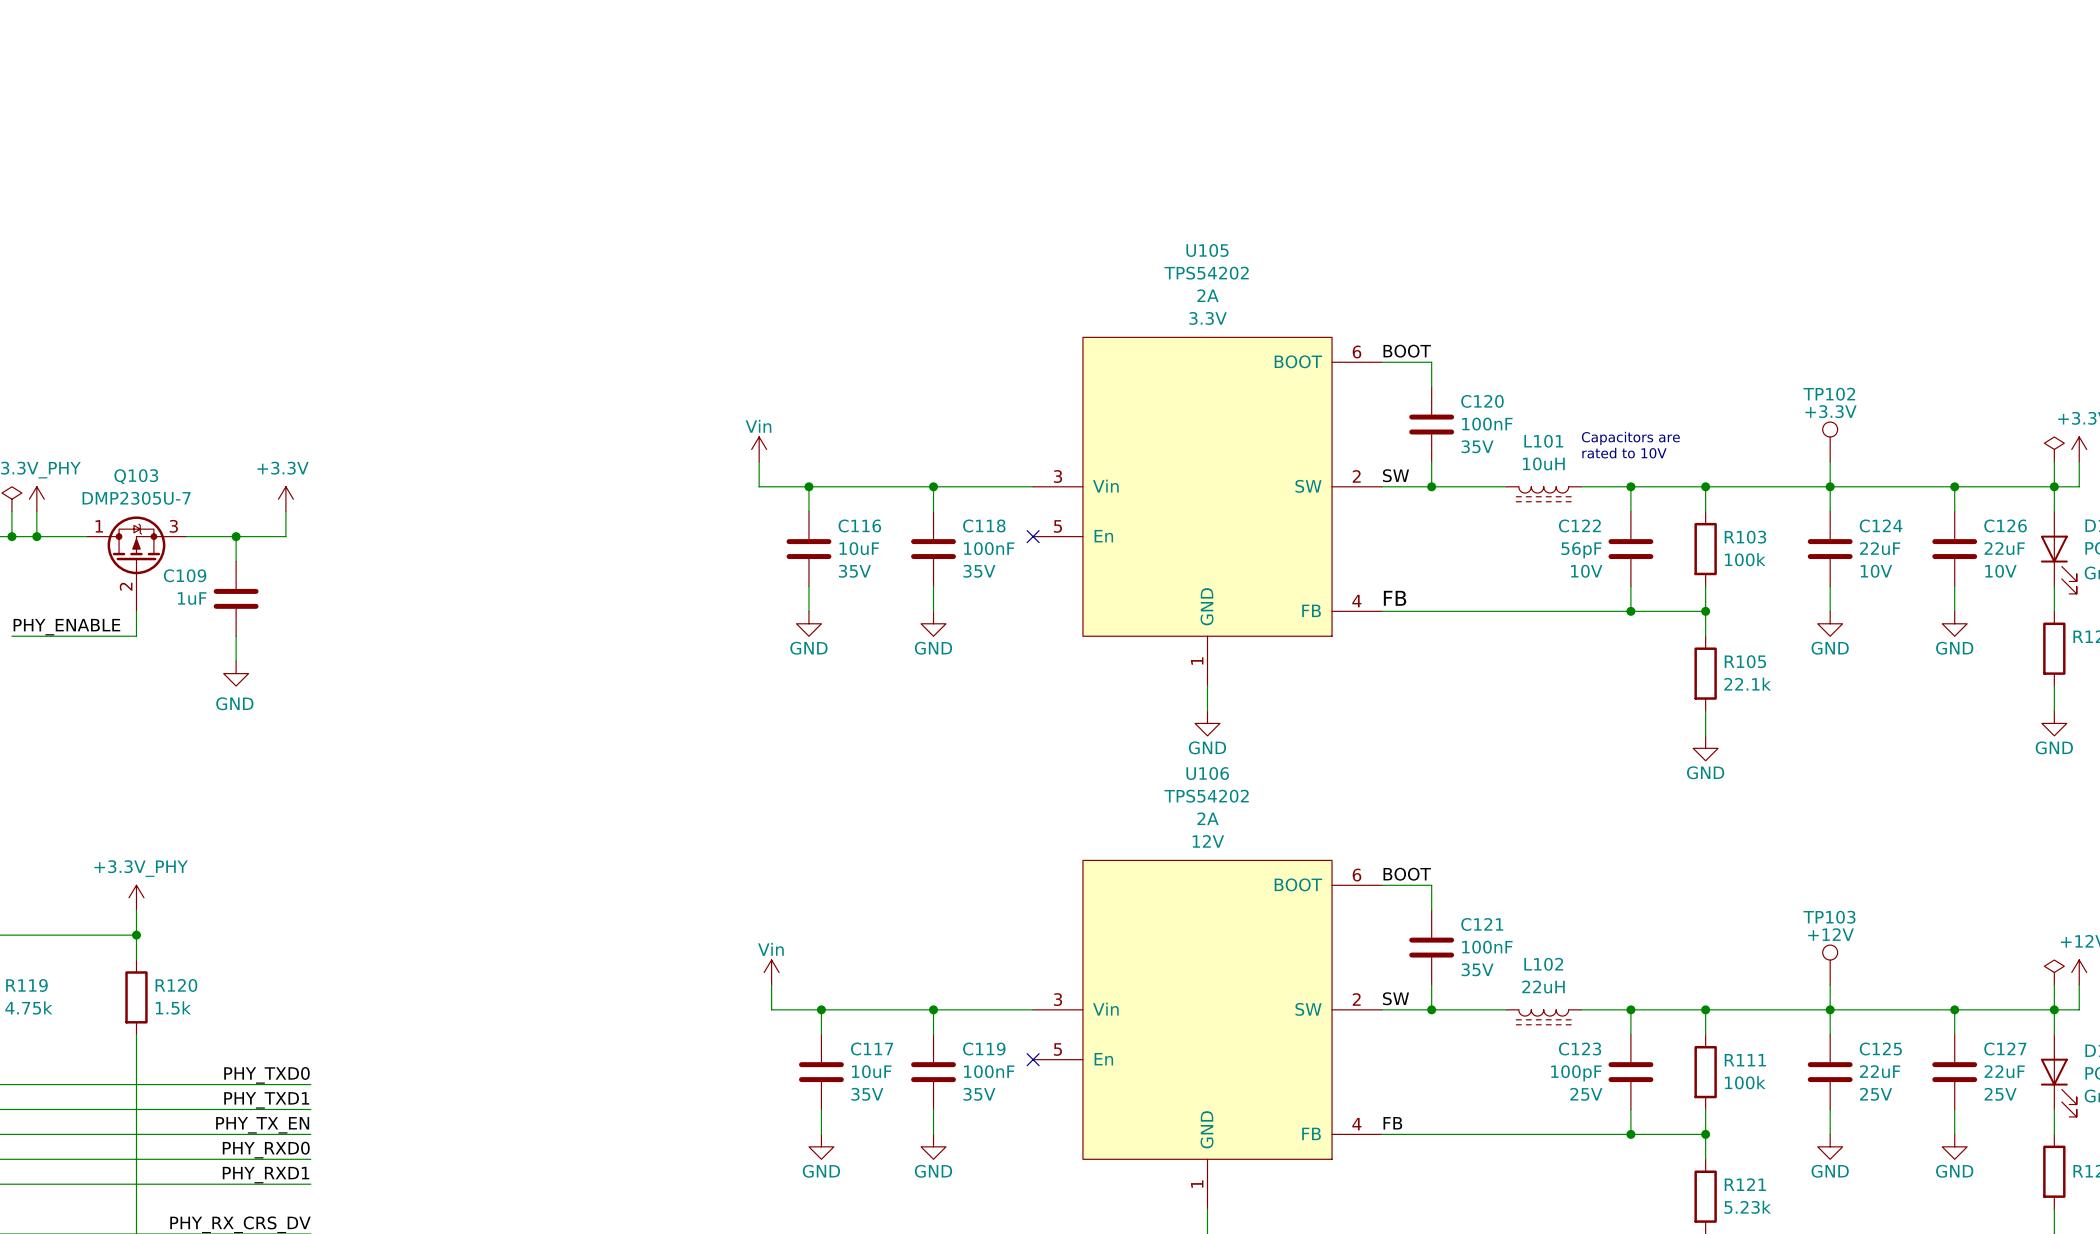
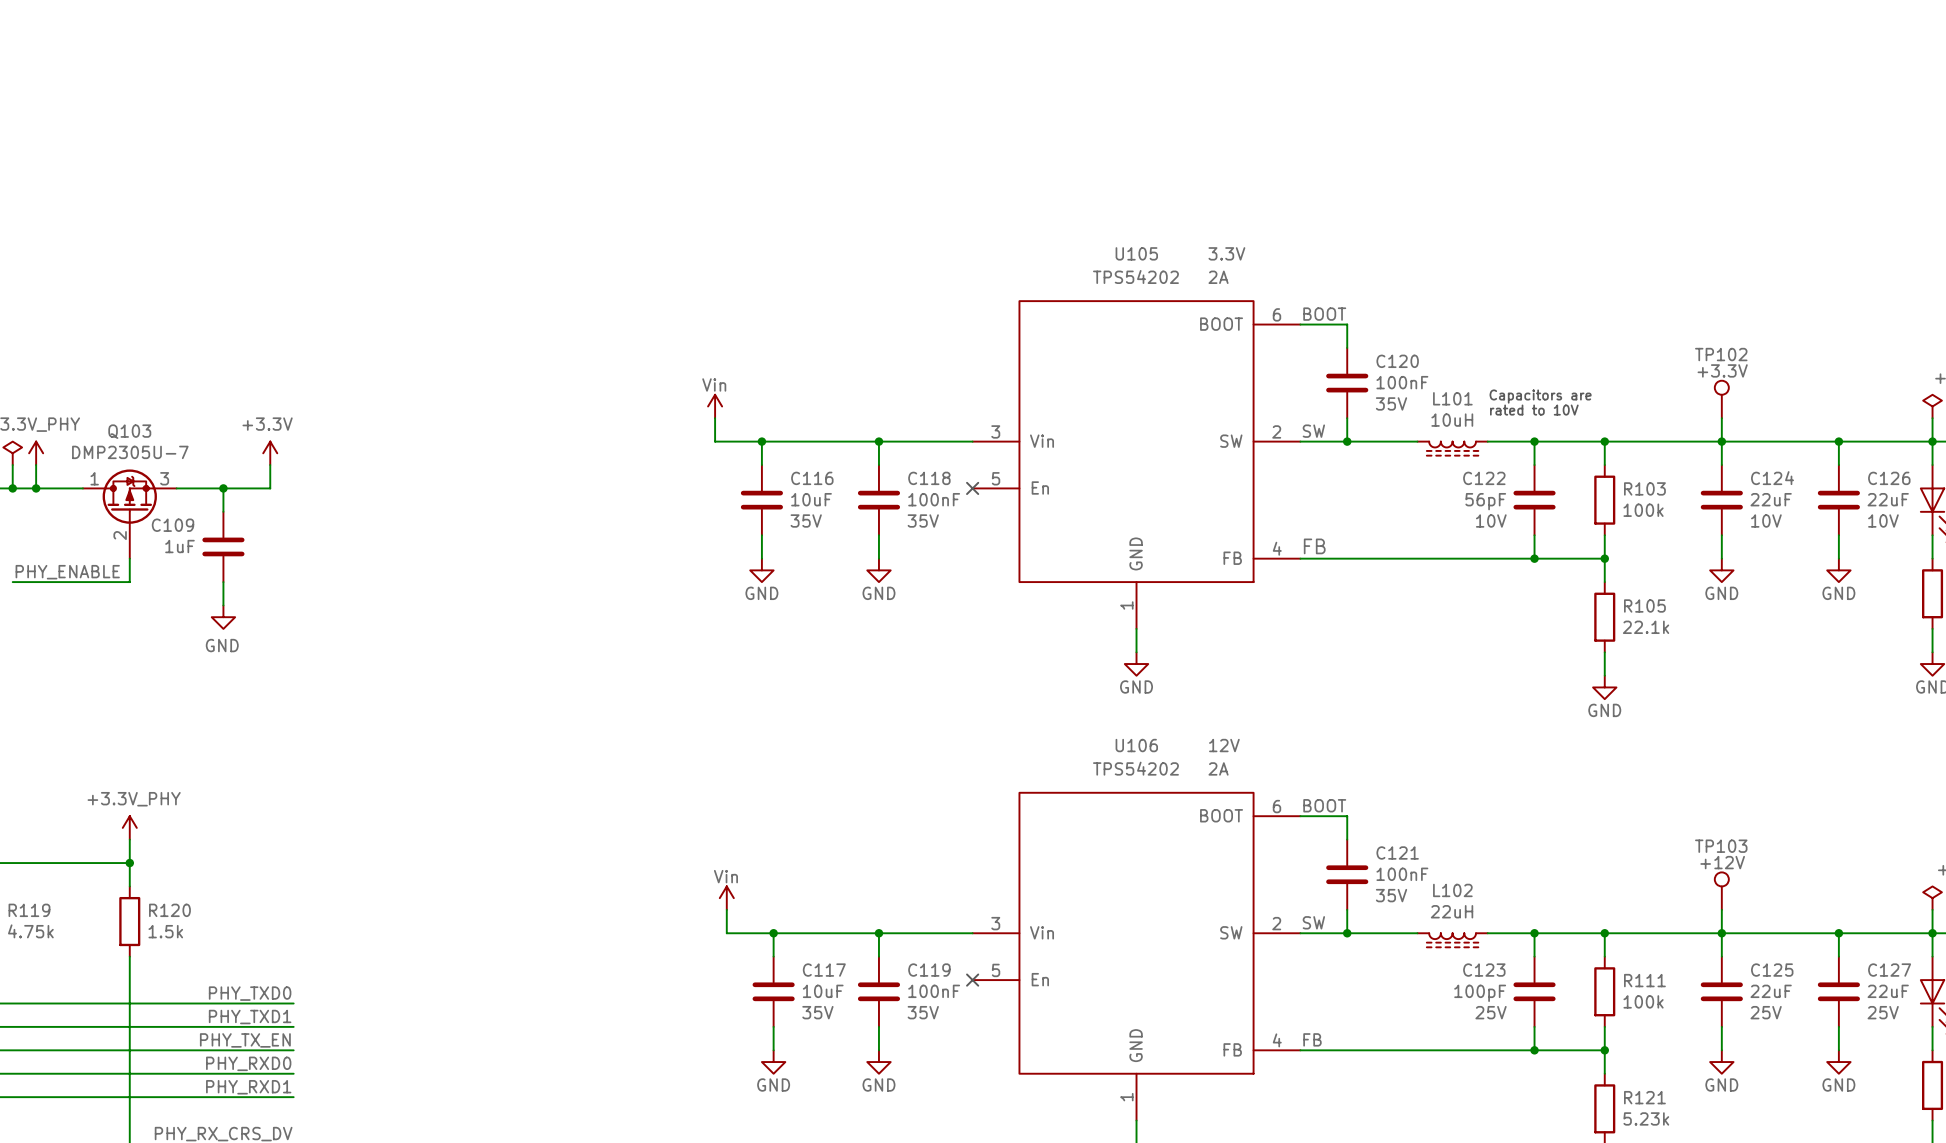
U105 name position: U105 (1207, 250) -> U105 (1136, 253)
U105 value position: TPS54202 (1206, 273) -> TPS54202 (1135, 277)
U105 text position: 2A (1208, 295) -> 2A (1218, 277)
U105 text position: 3.3V (1208, 318) -> 3.3V (1226, 253)
U106 name position: U106 (1207, 773) -> U106 (1136, 745)
U106 value position: TPS54202 (1206, 796) -> TPS54202 (1135, 768)
U106 text position: 2A (1208, 818) -> 2A (1218, 768)
U106 text position: 12V (1208, 841) -> 12V (1224, 745)

